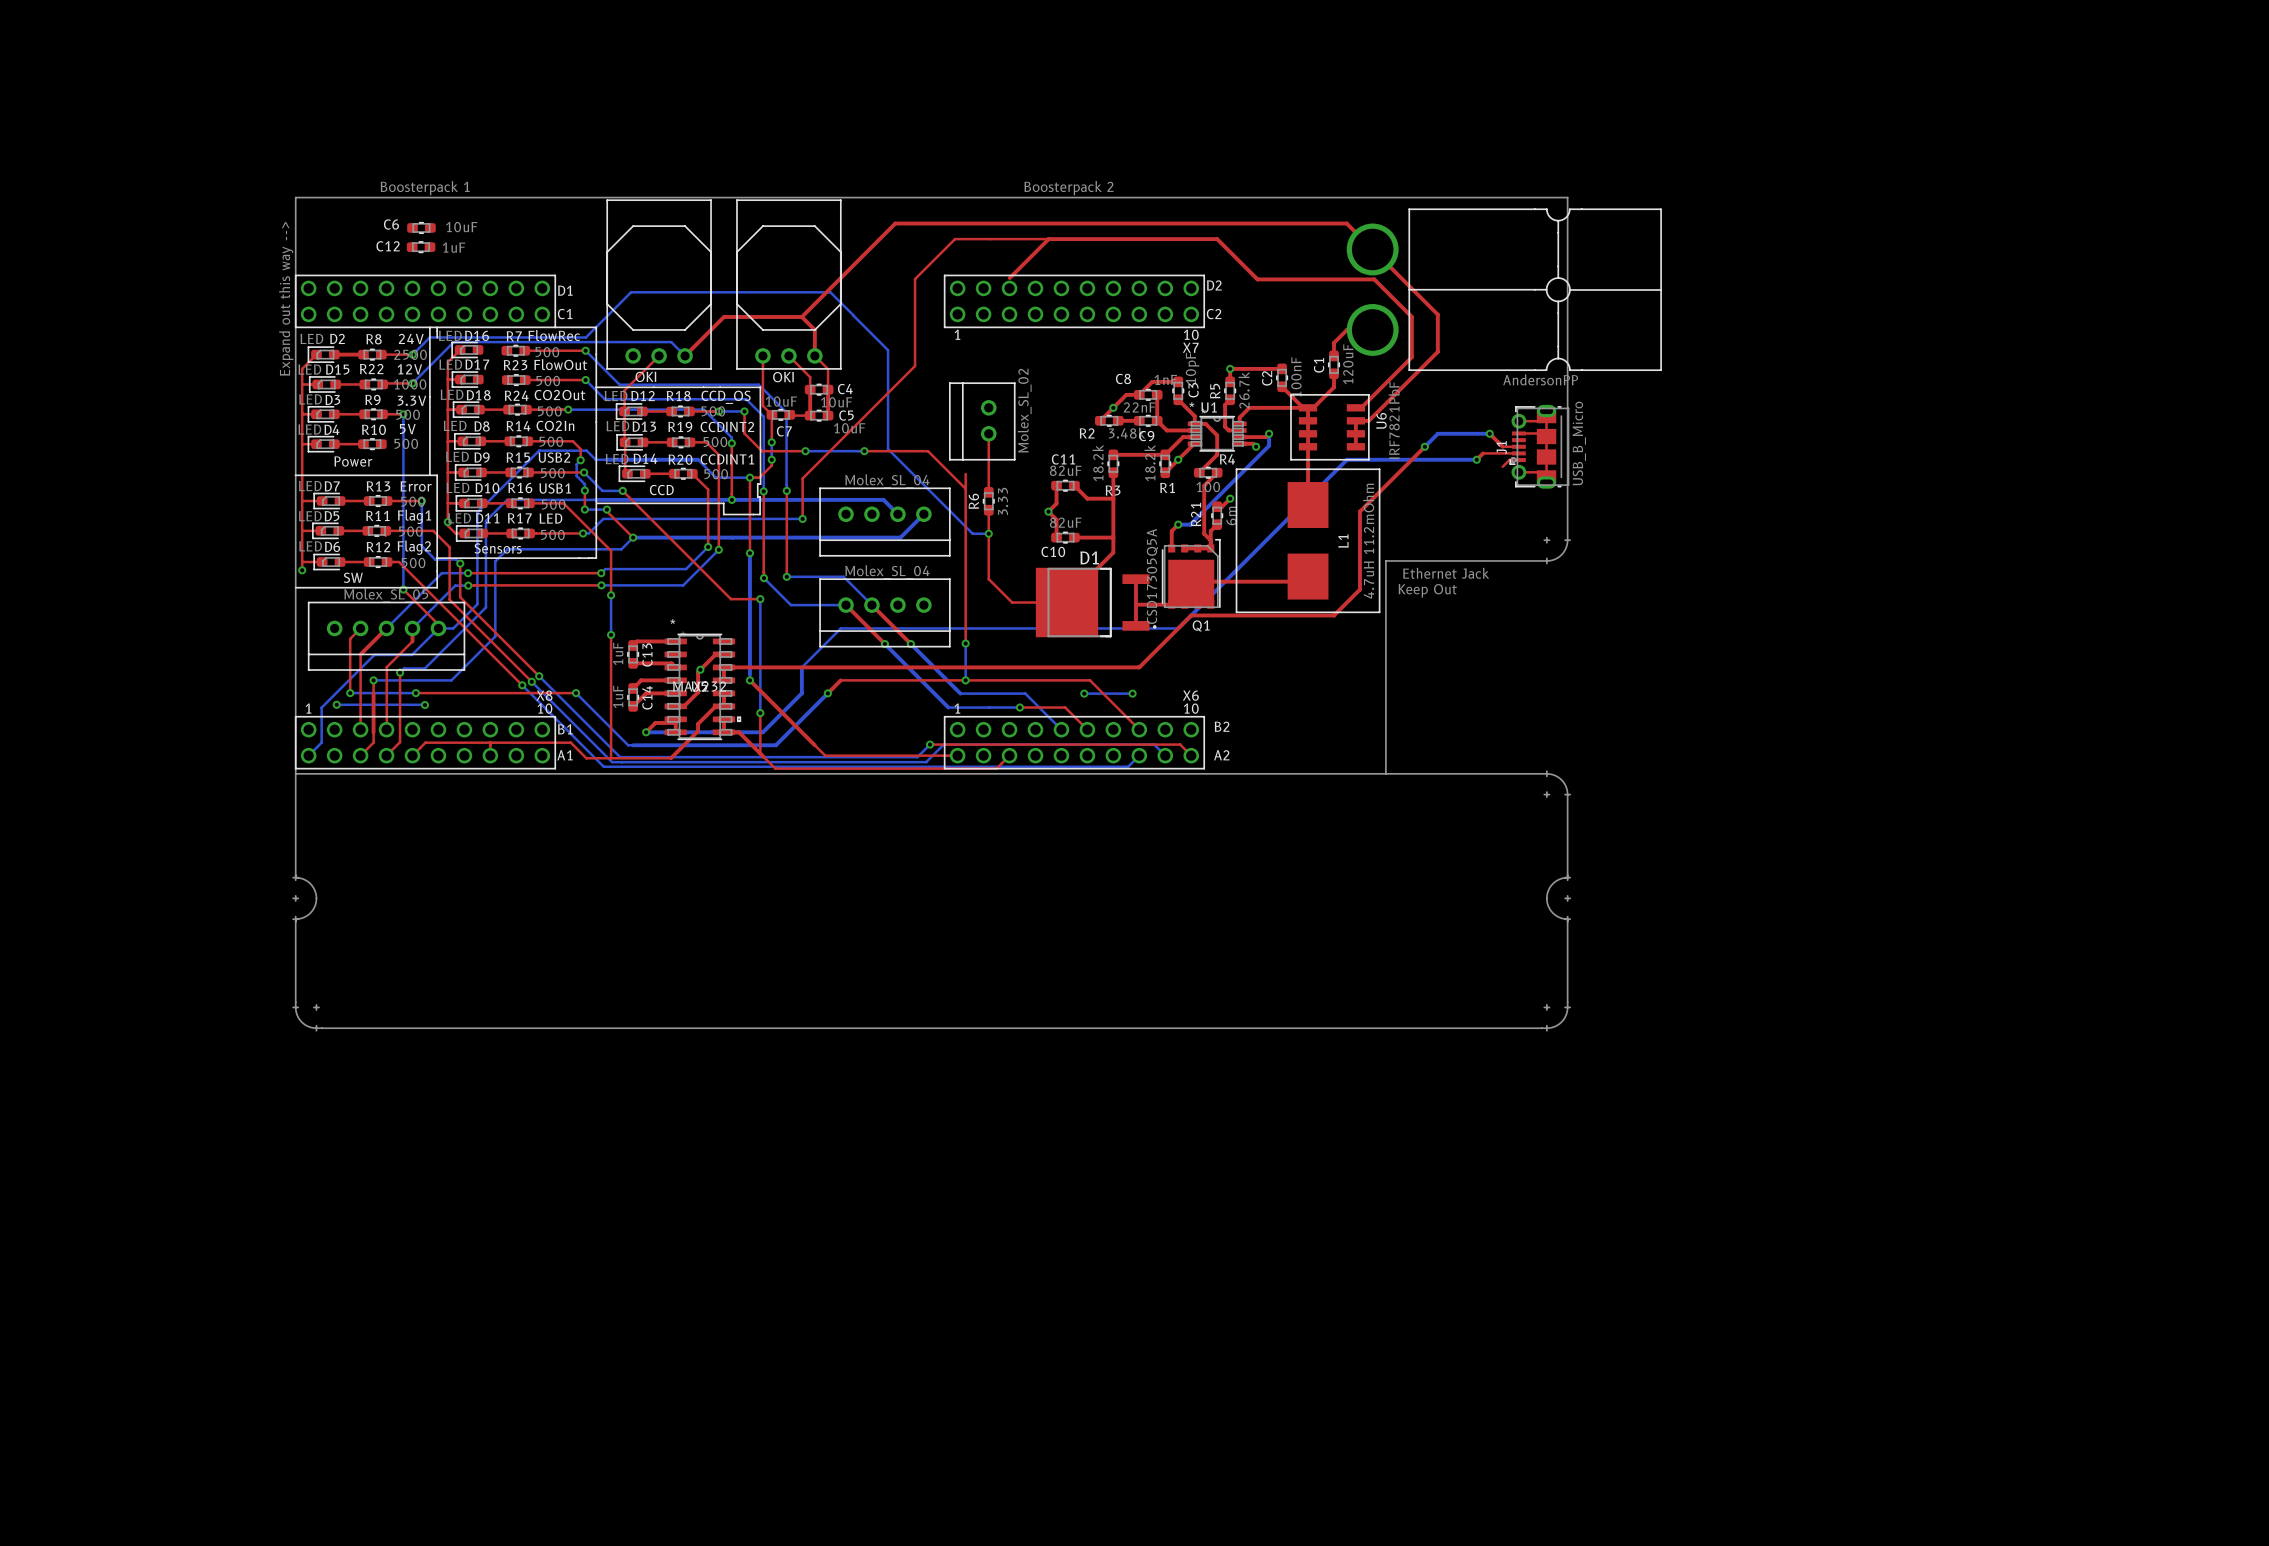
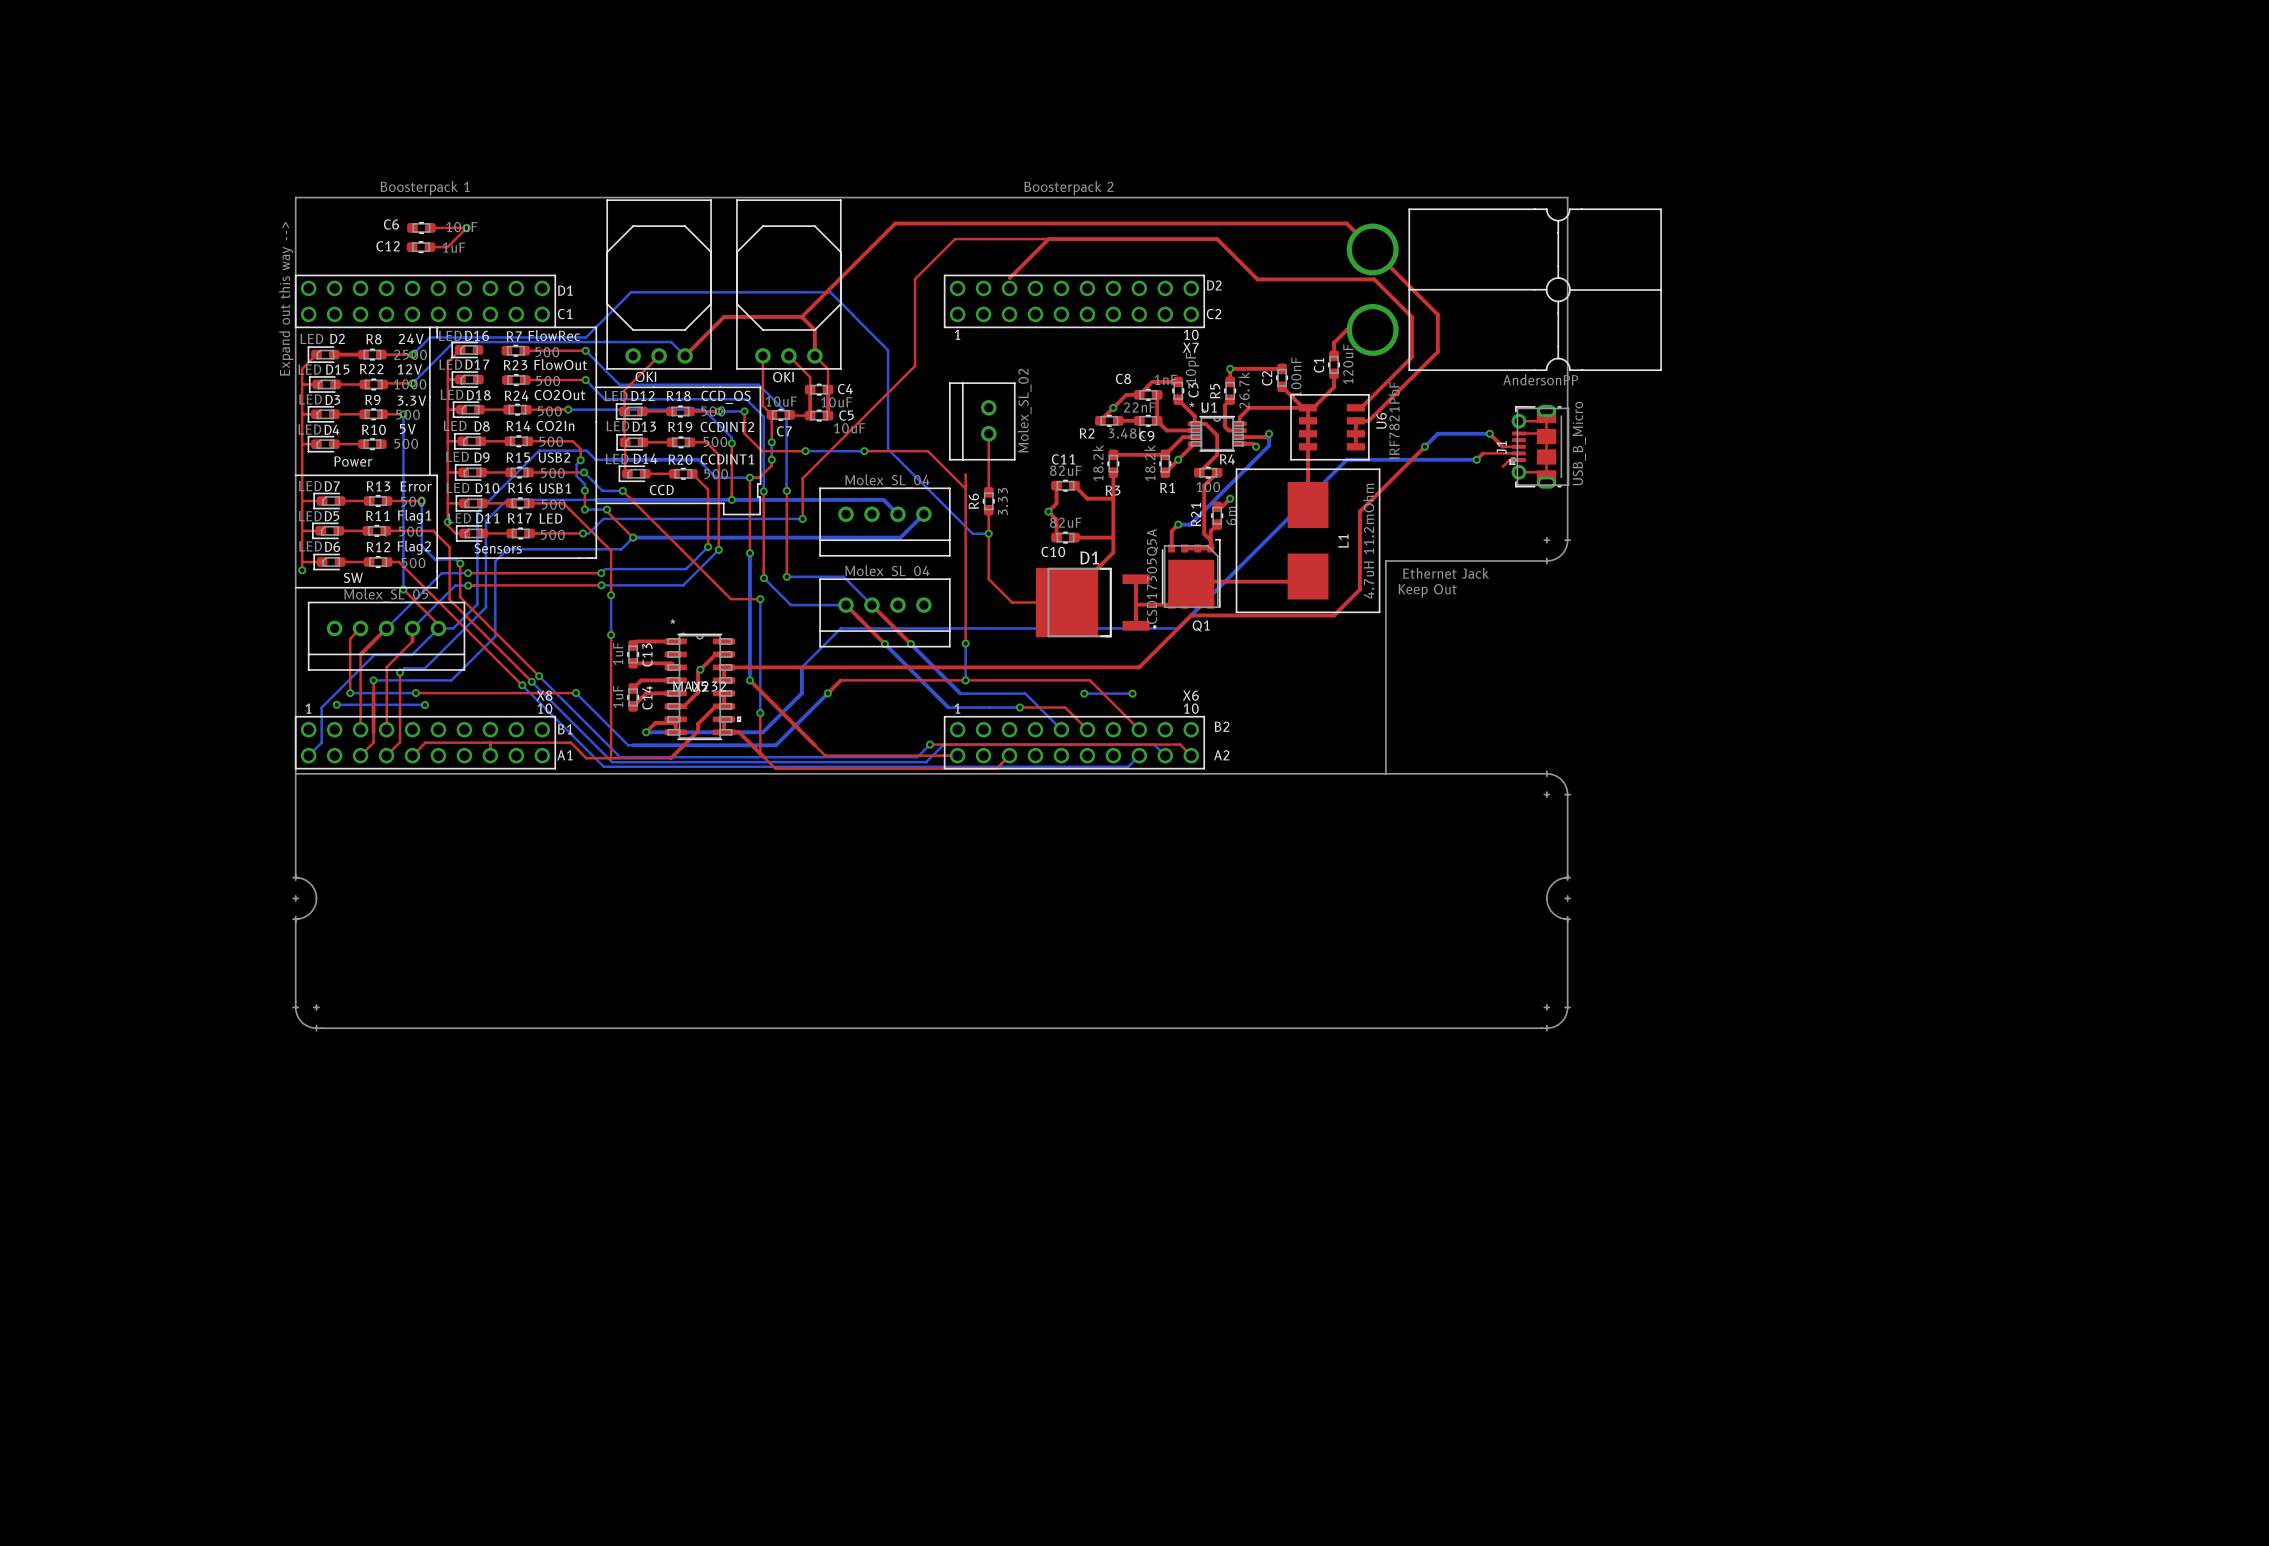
top track: none -> (430, 227) (466, 227) (447, 247) (430, 247)
via: none -> (466, 227)

